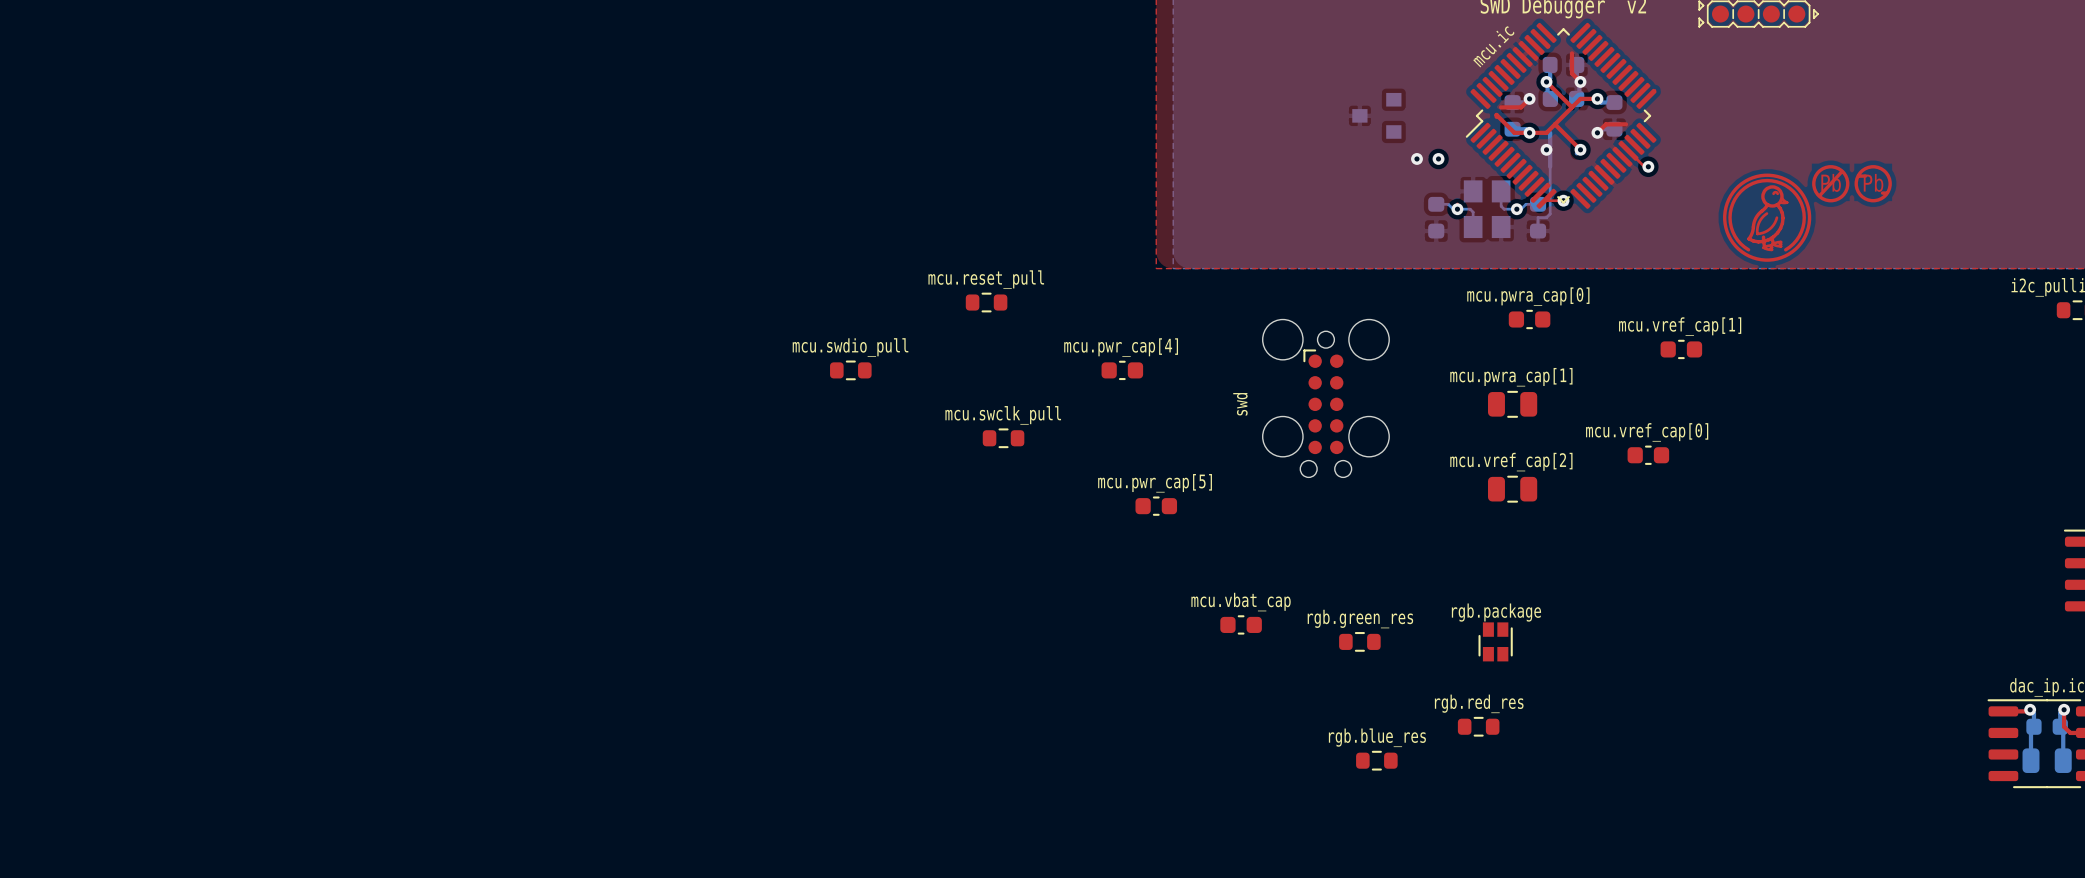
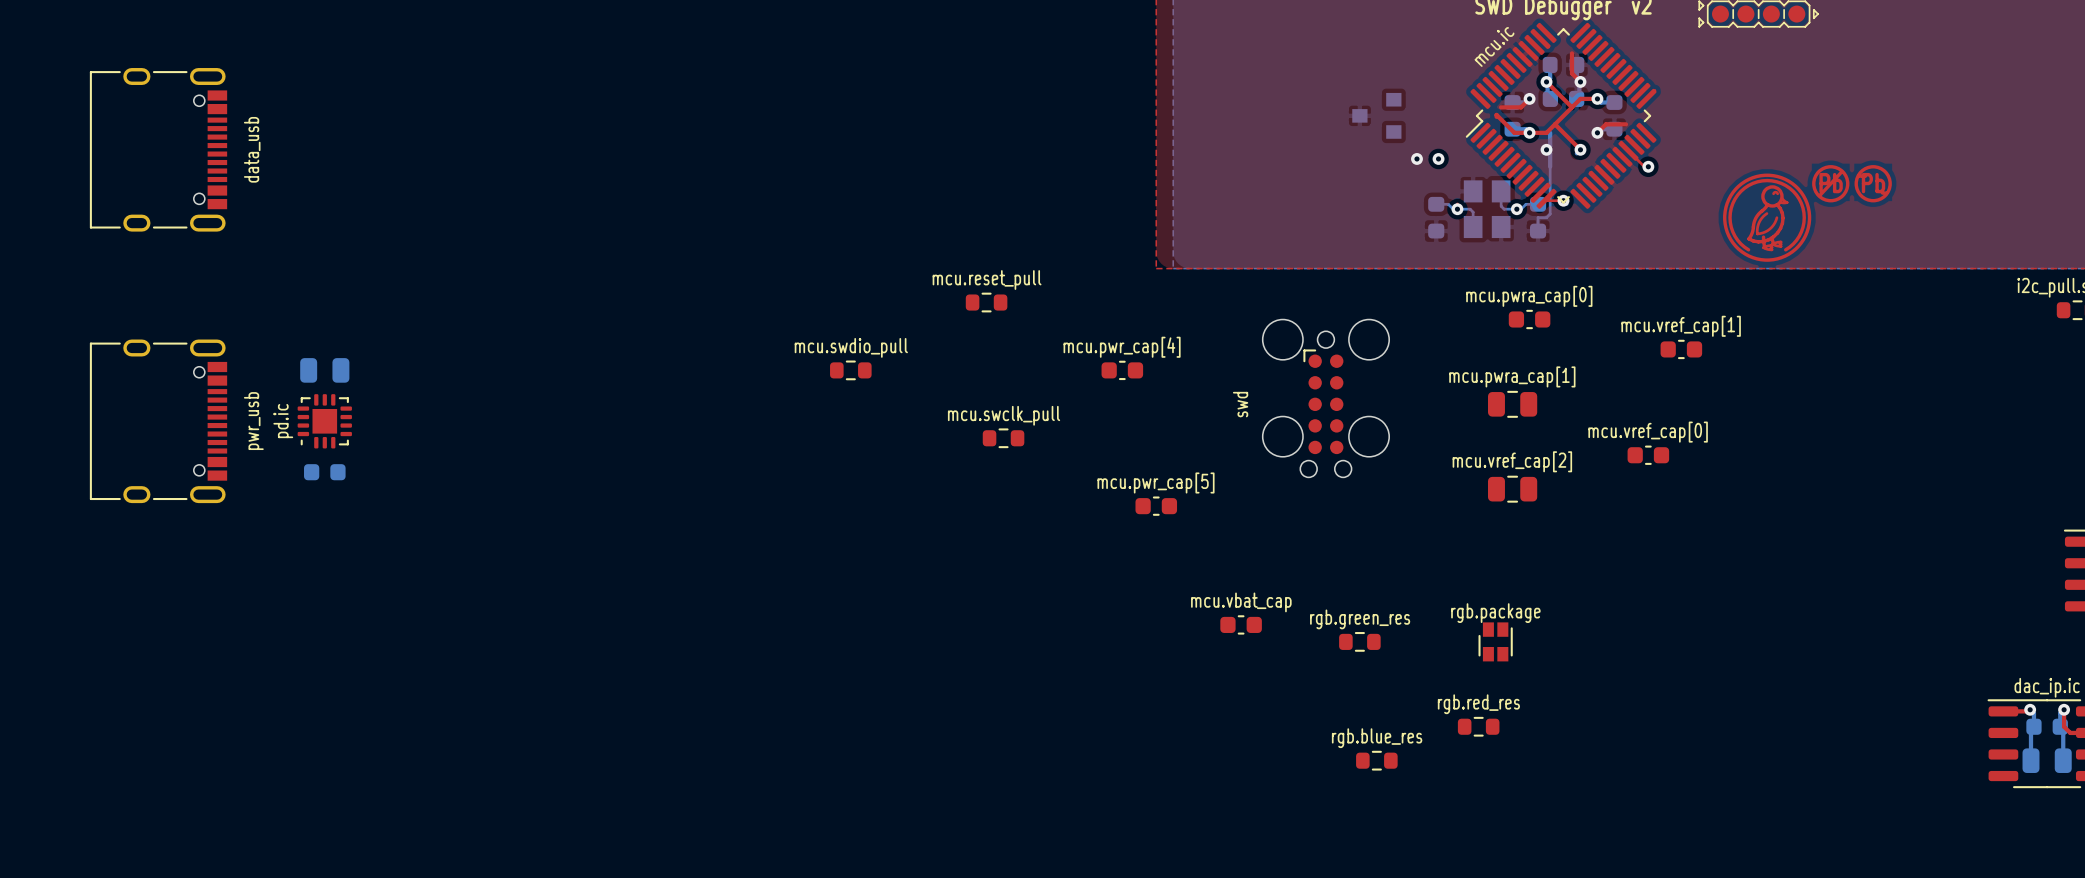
data_usb: none -> (158, 149)
part: none -> (324, 370)
pwr_usb: none -> (158, 421)
pd.ic: none -> (324, 421)
part: none -> (324, 472)

